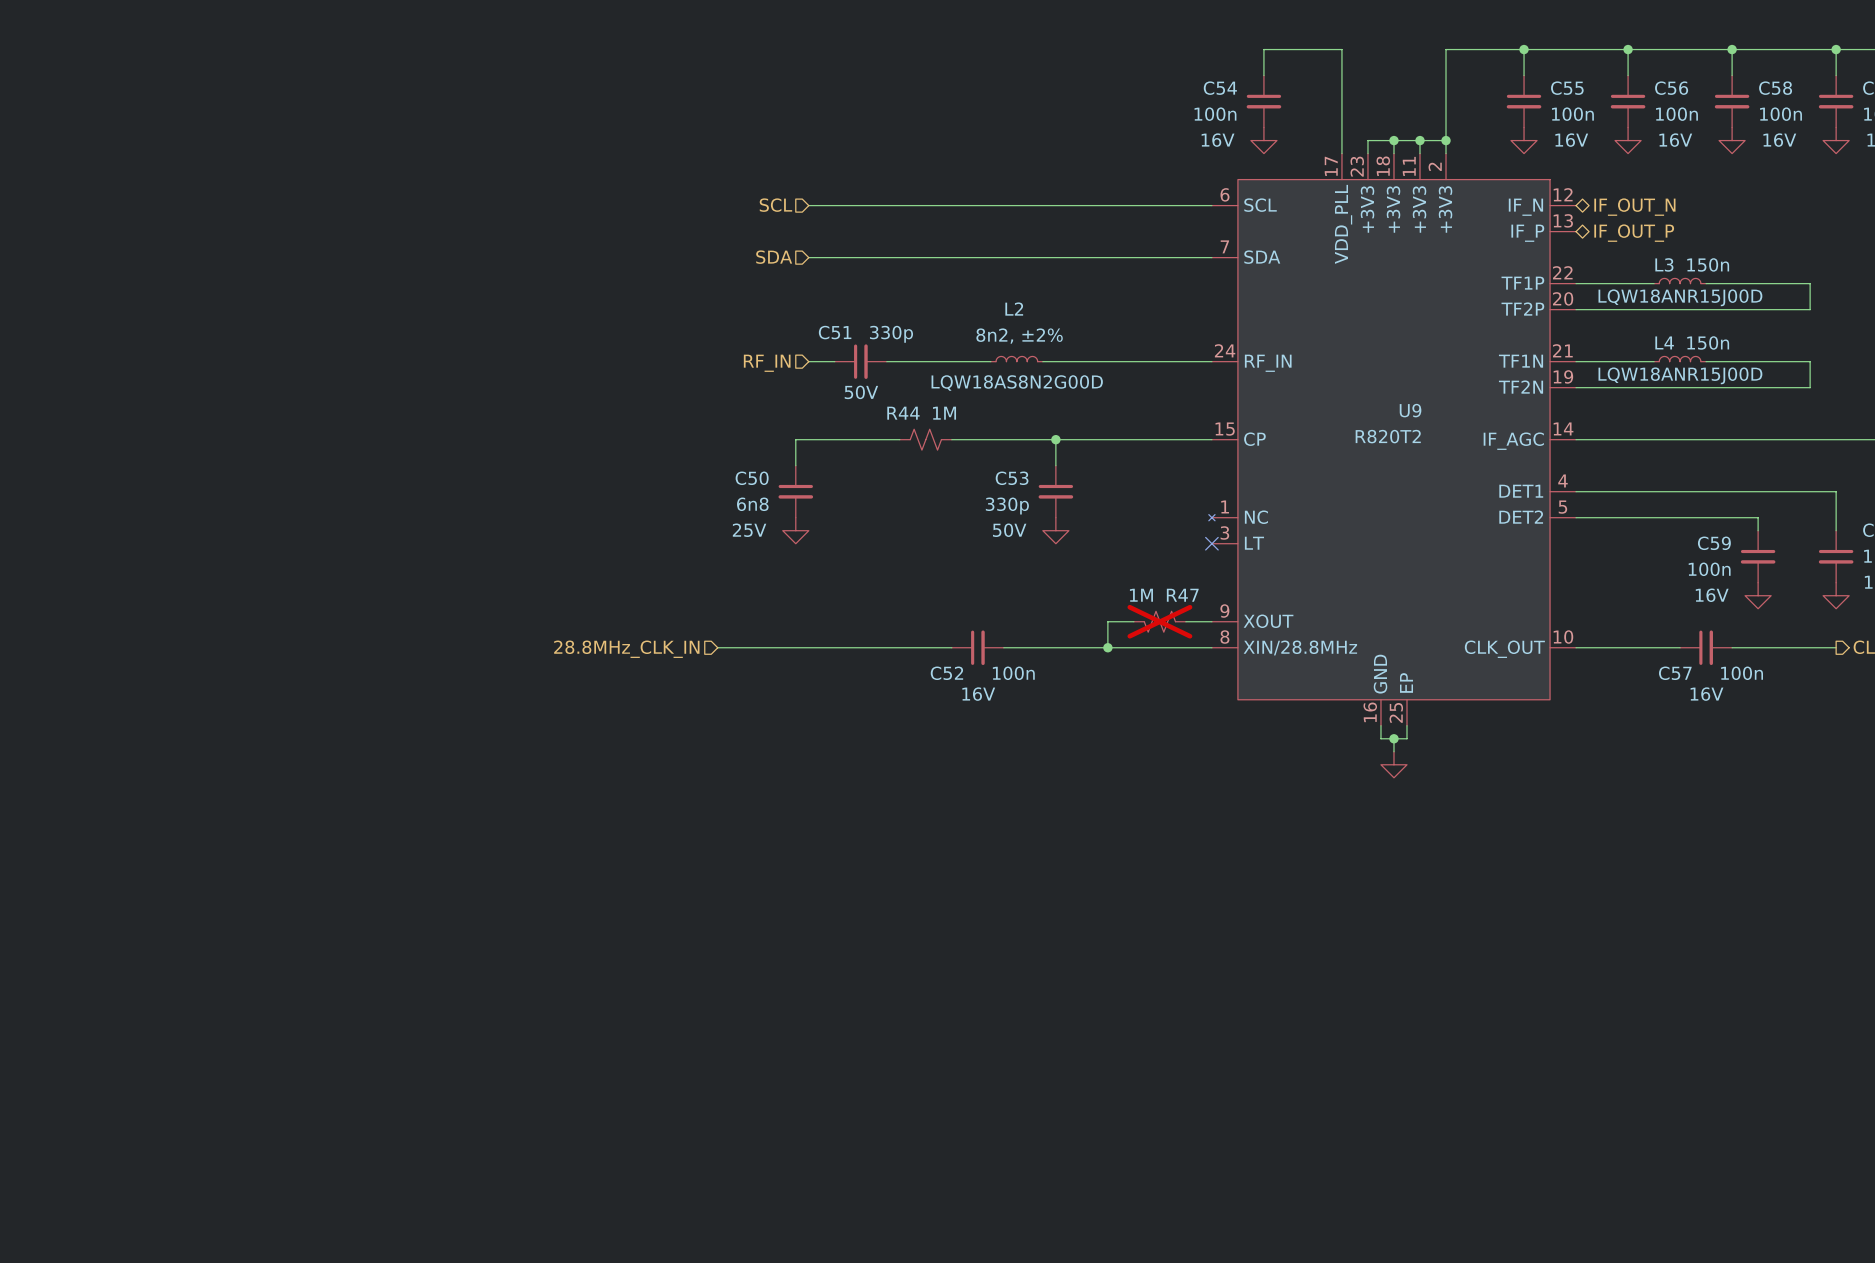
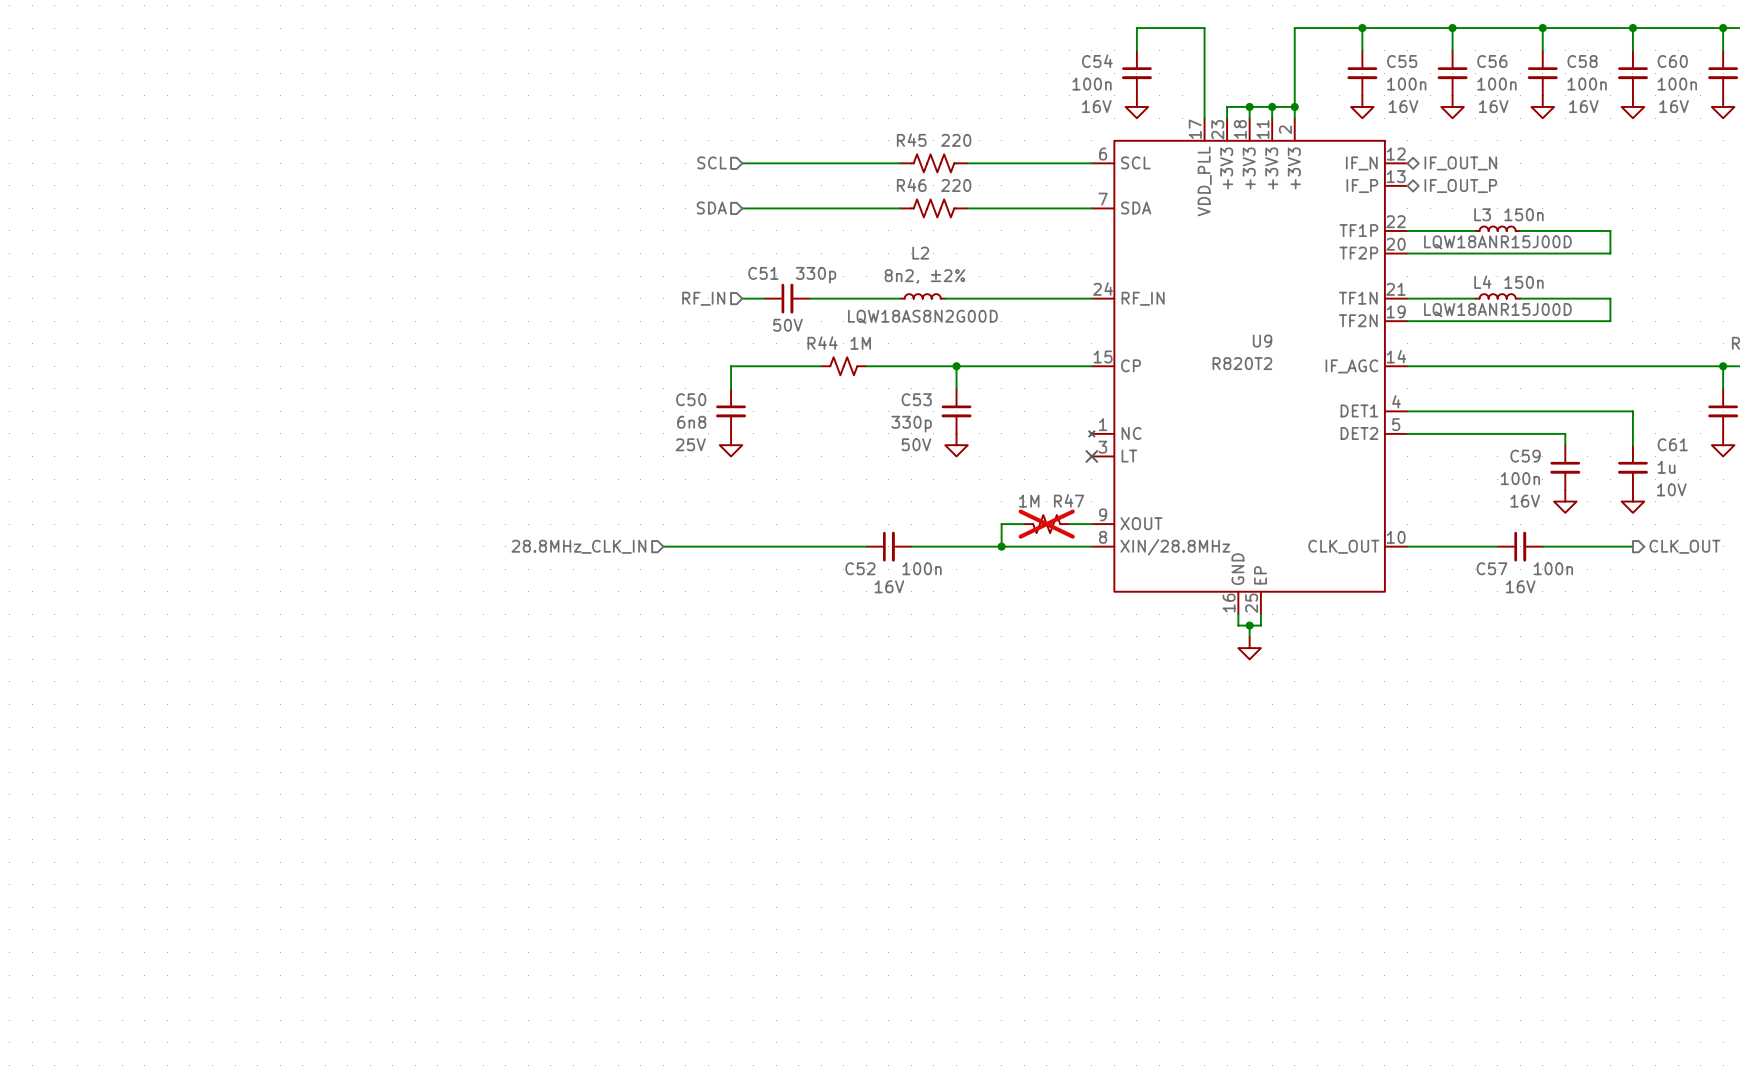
R45: none -> 220 (933, 163)
R46: none -> 220 (933, 208)

